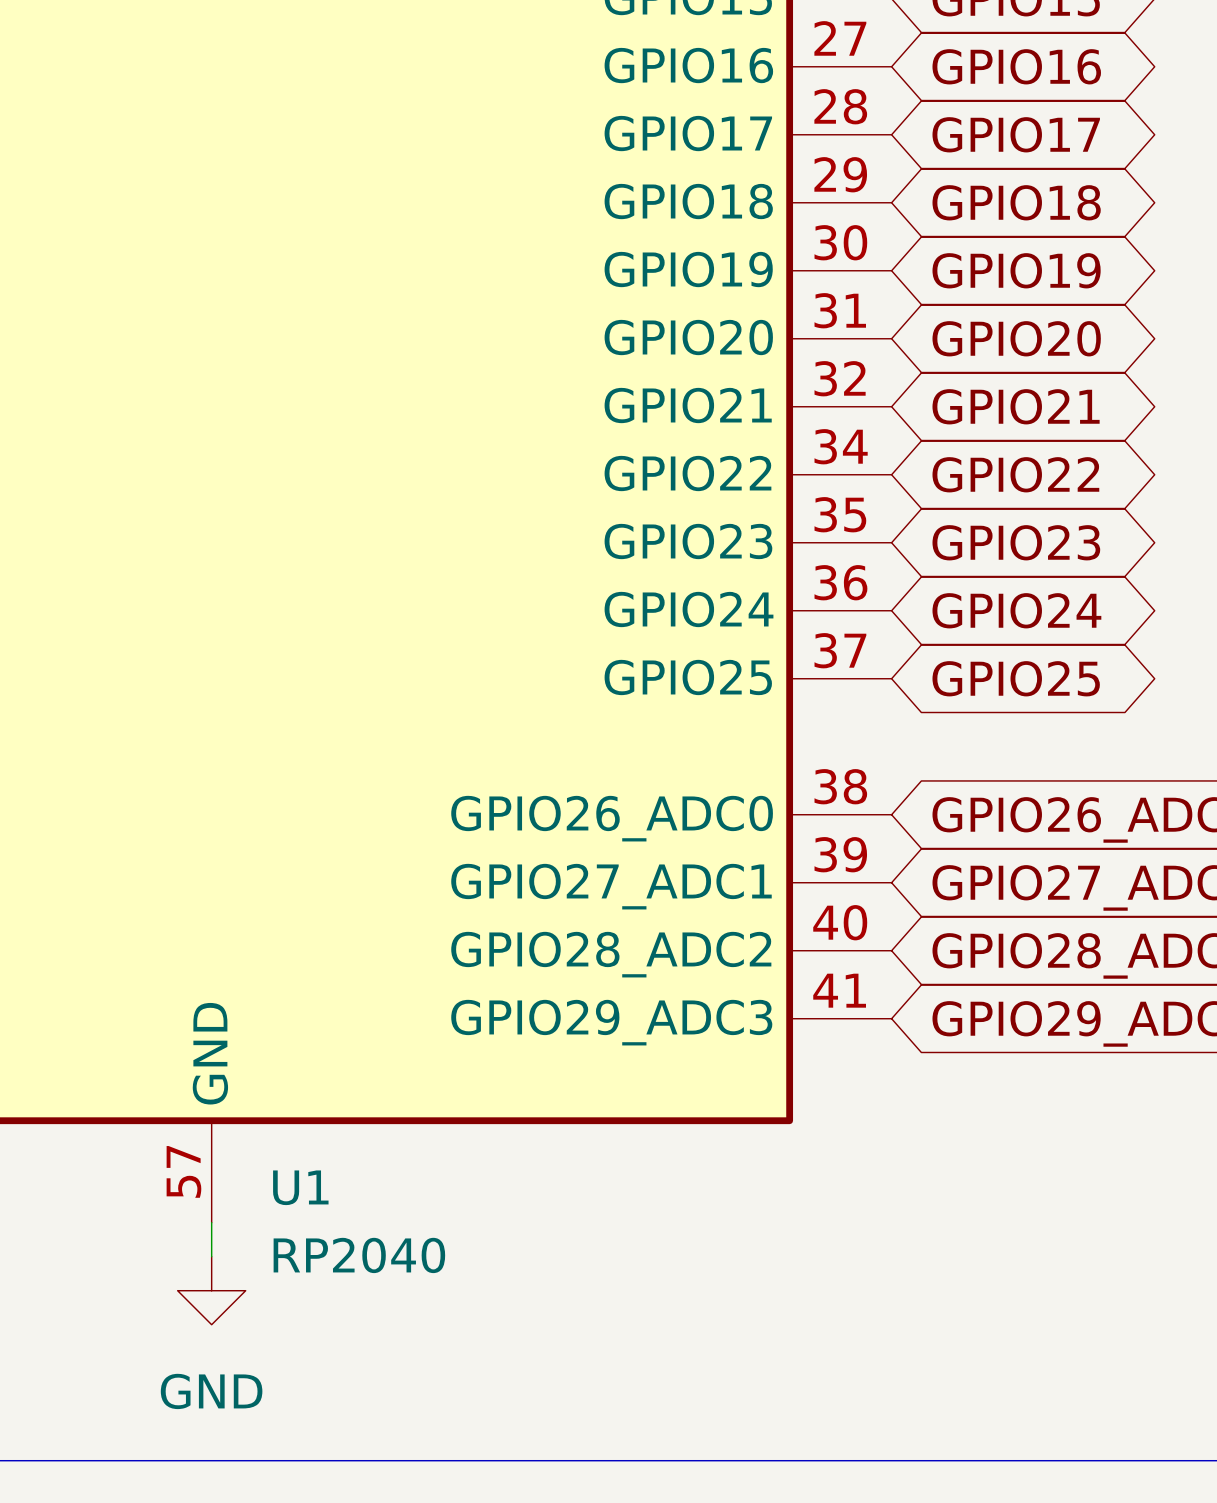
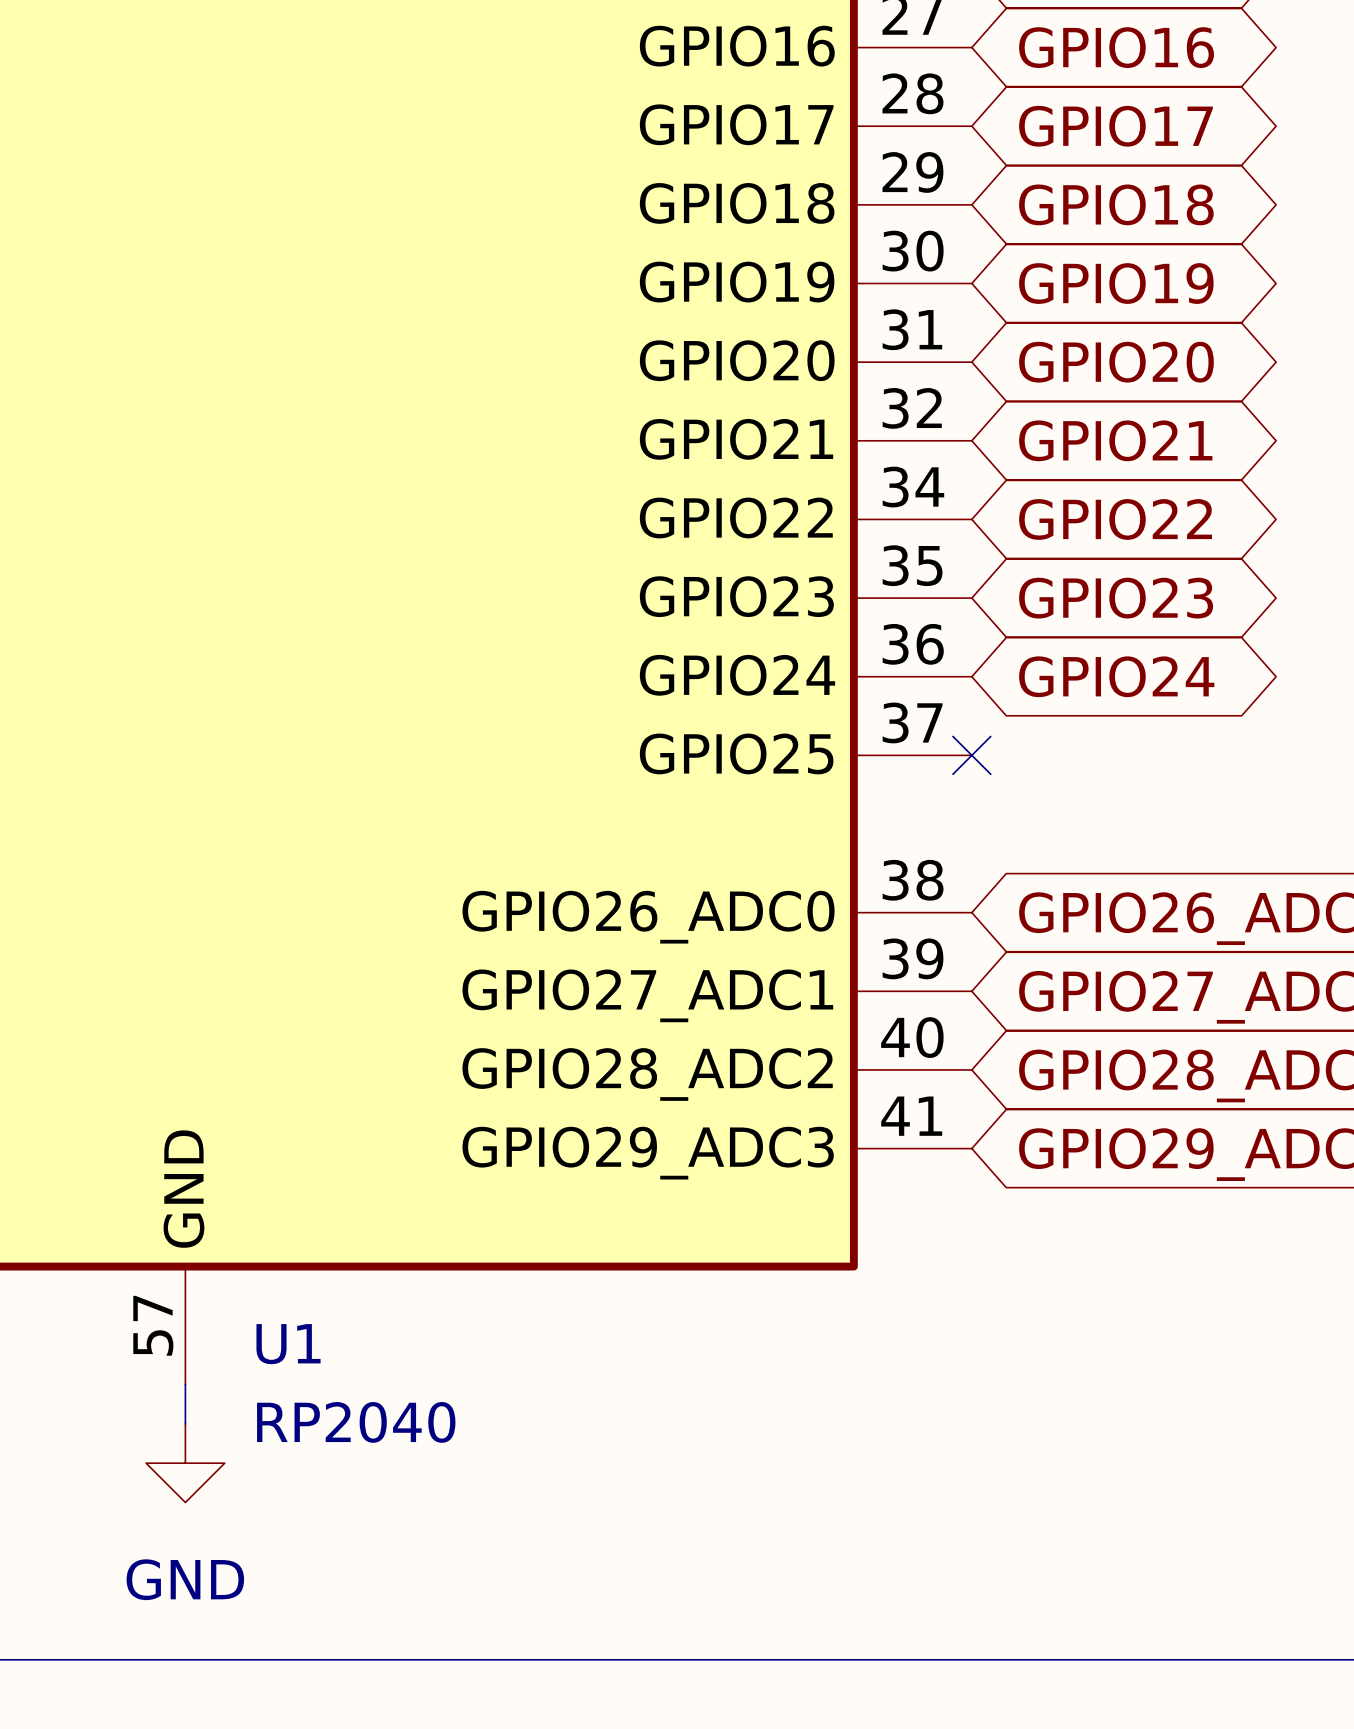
no-connect mark: none -> (971, 755)
global label: GPIO25 (1016, 678) -> none

